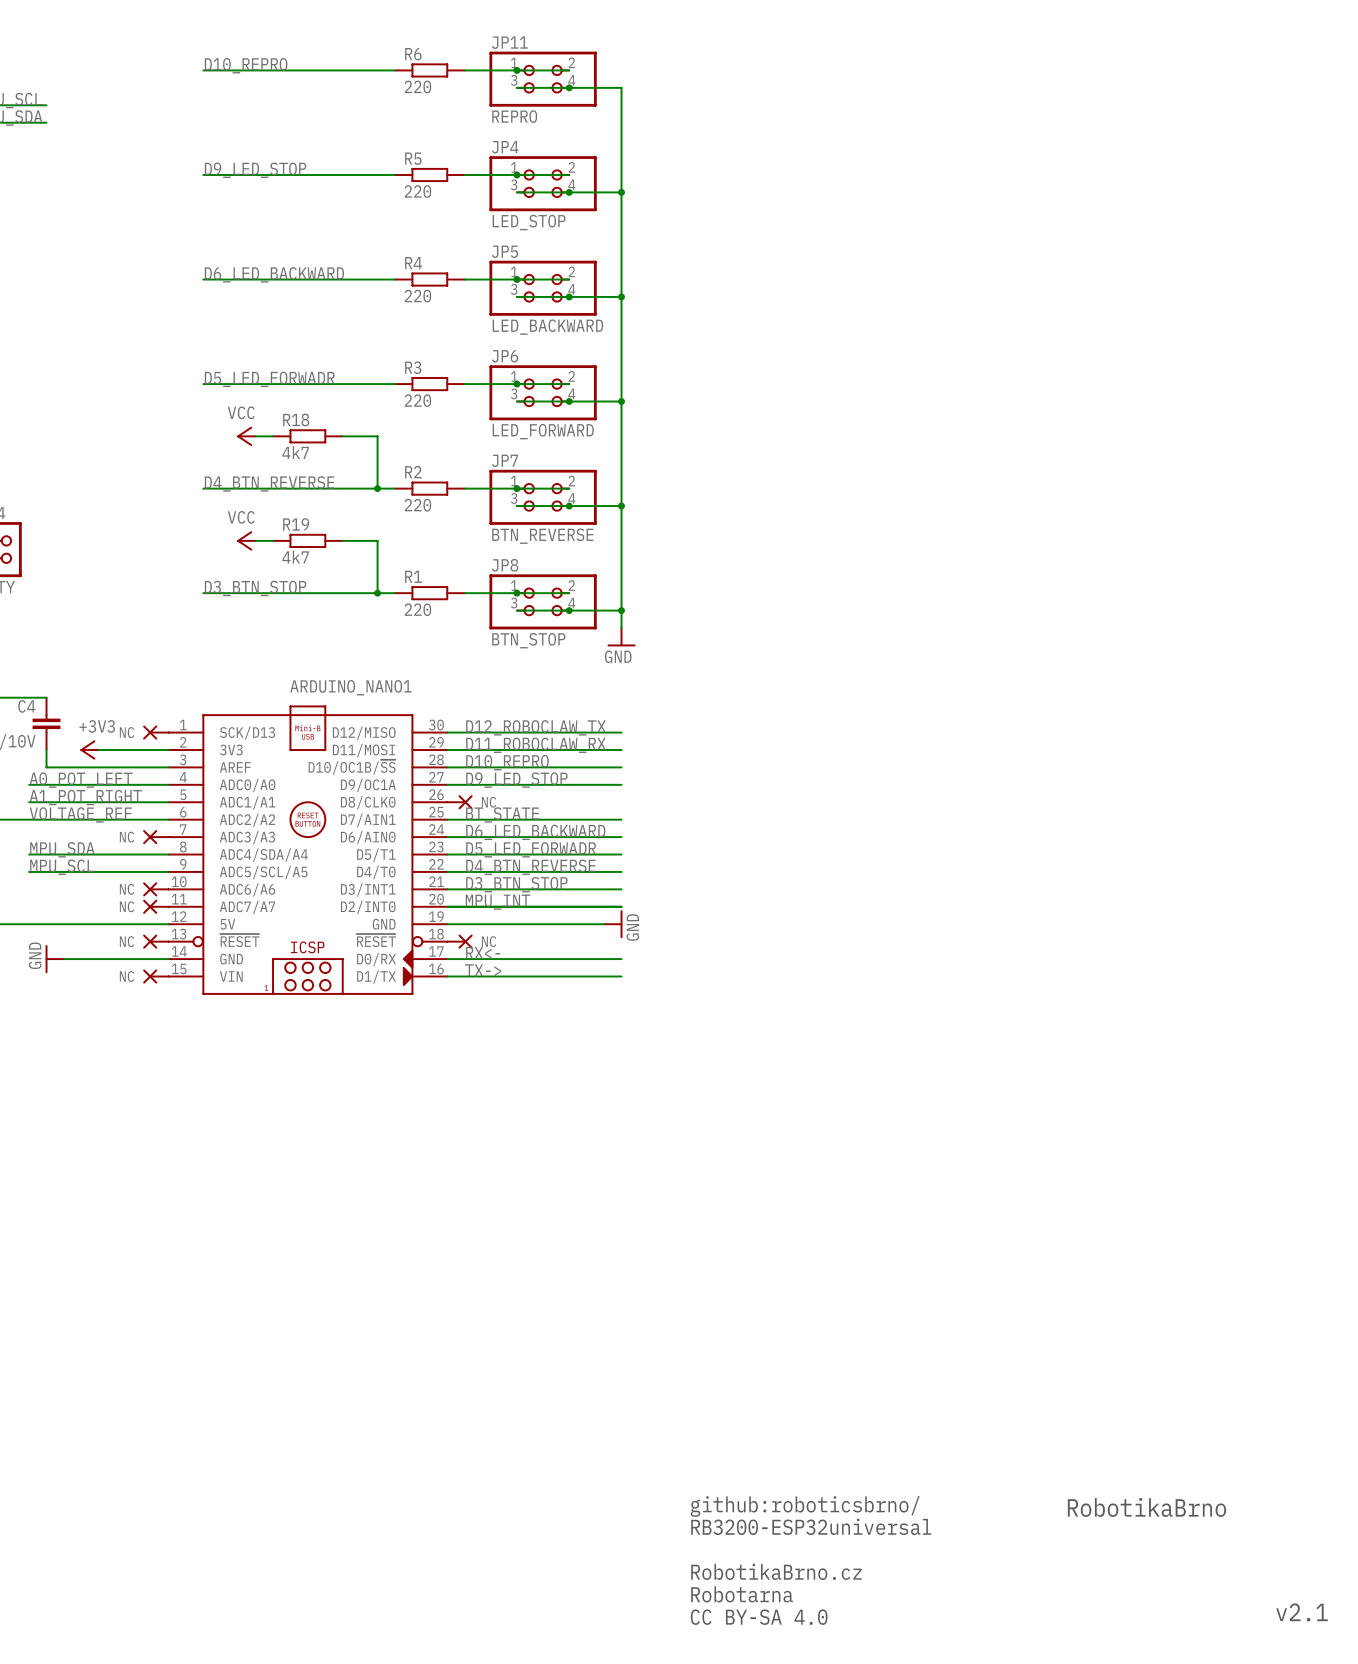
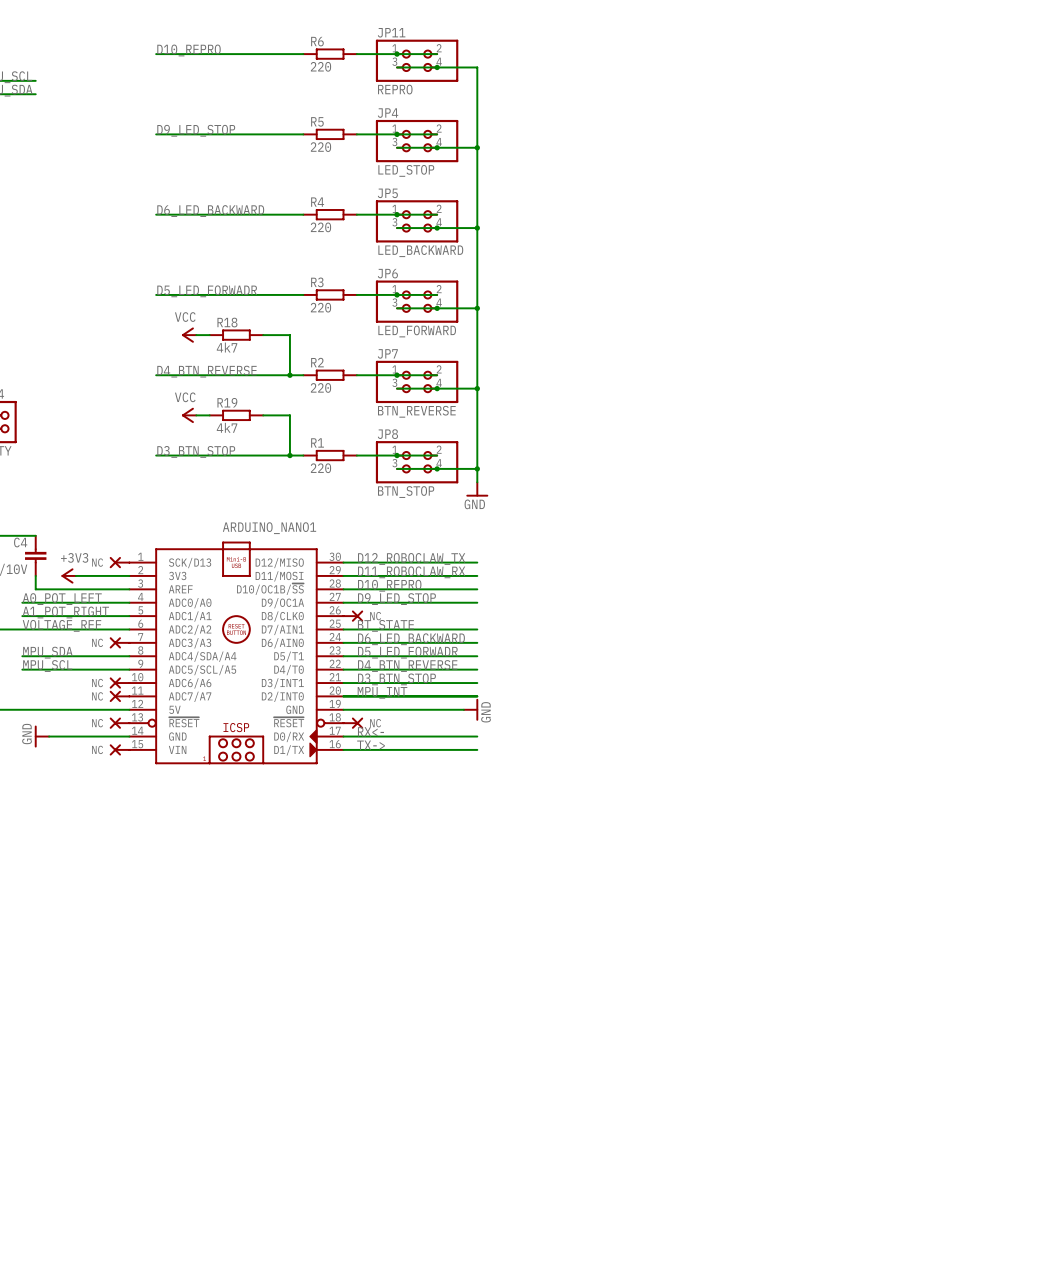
text: github:roboticsbrno/ (805, 1506) -> none
text: RobotikaBrno (1146, 1507) -> none
text: RB3200-ESP32universal (811, 1526) -> none
text: RobotikaBrno.cz (776, 1571) -> none
text: Robotarna (742, 1594) -> none
text: v2.1 (1302, 1612) -> none
text: CC BY-SA 4.0 (759, 1617) -> none

